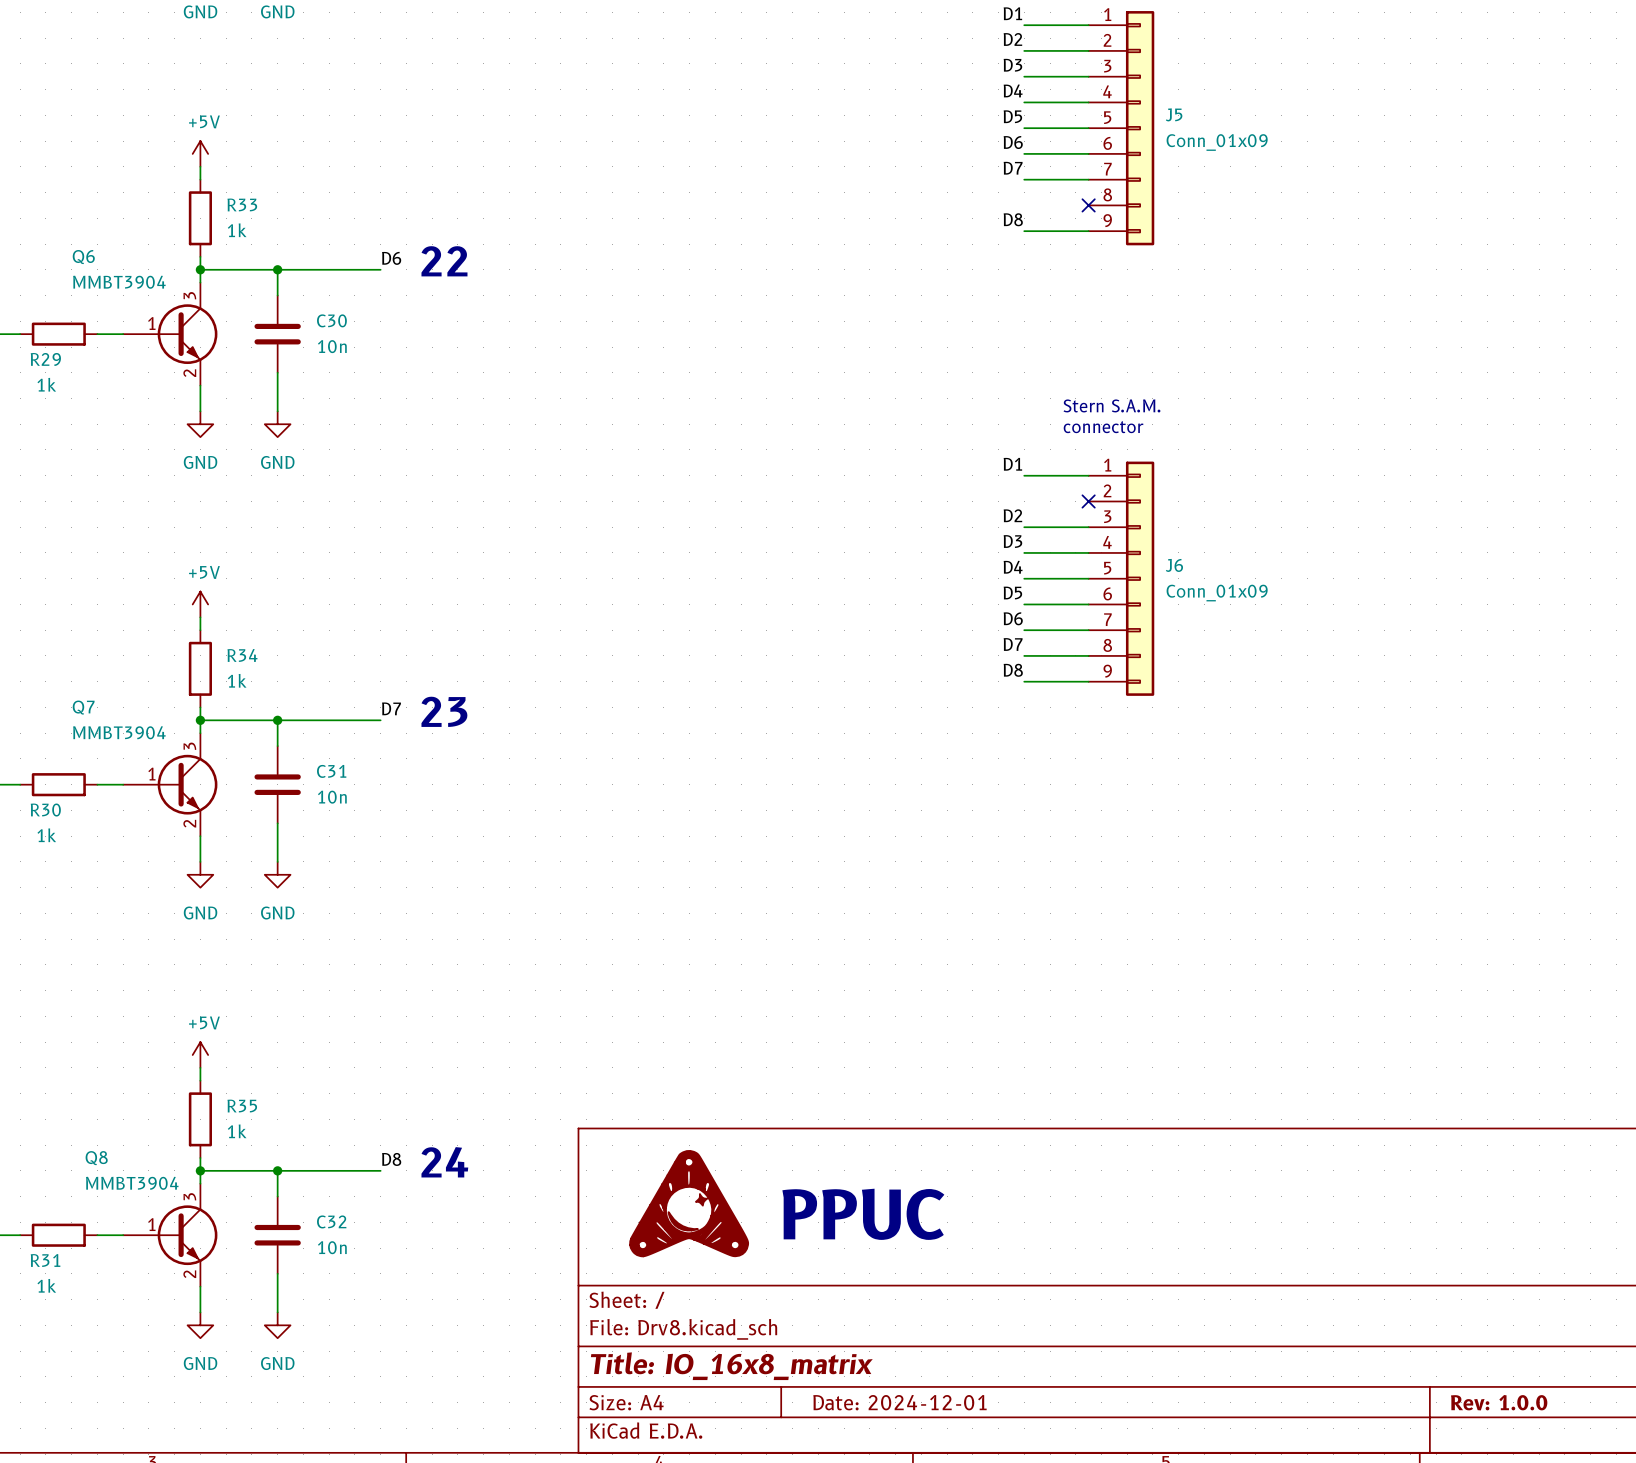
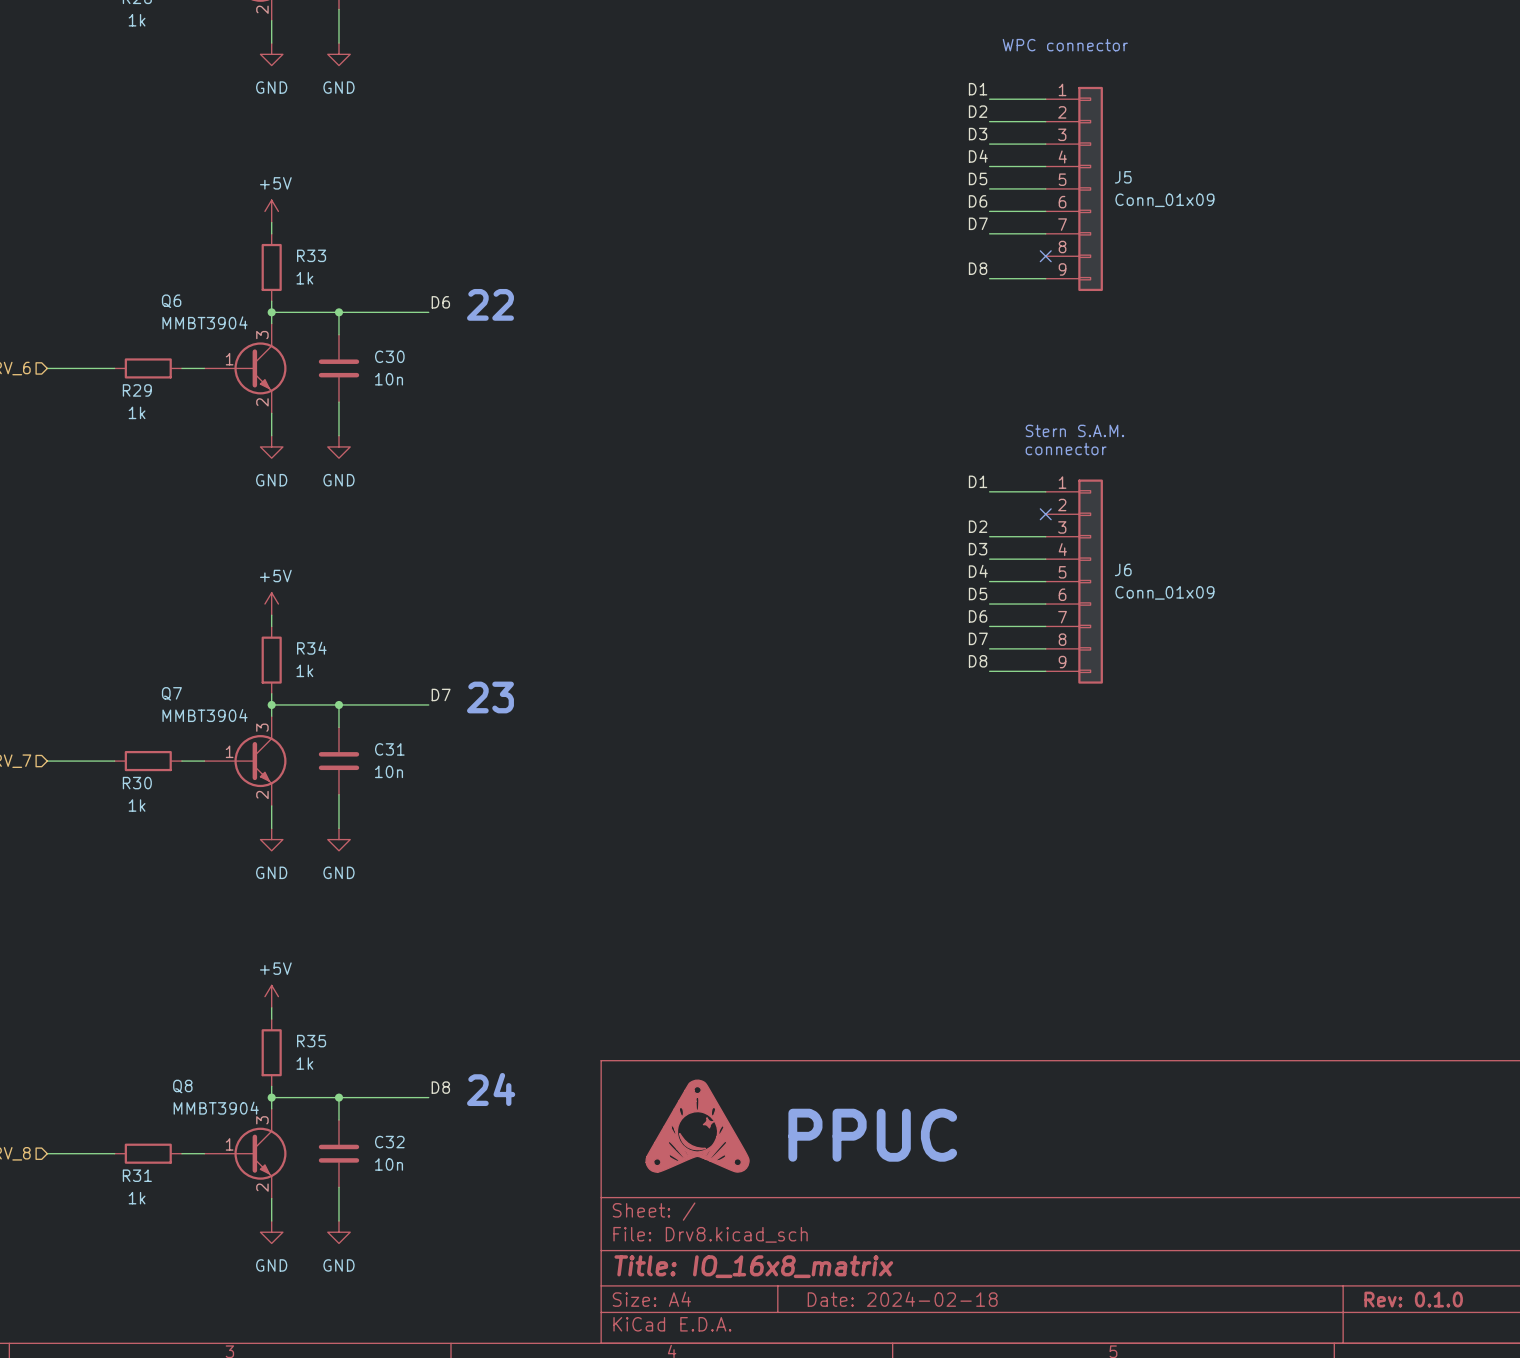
title block: Date: 2024-12-01 (899, 1402) -> Date: 2024-02-18 (902, 1299)
title block: Rev: 1.0.0 (1499, 1402) -> Rev: 0.1.0 (1413, 1299)

